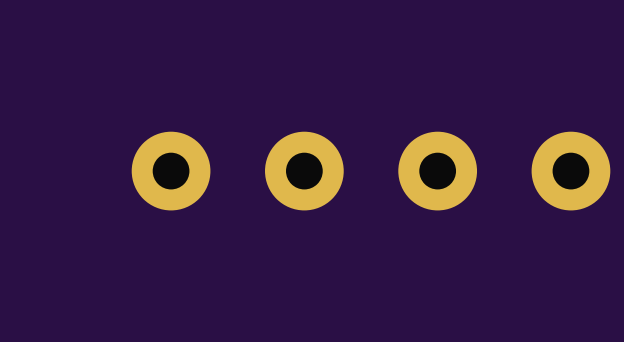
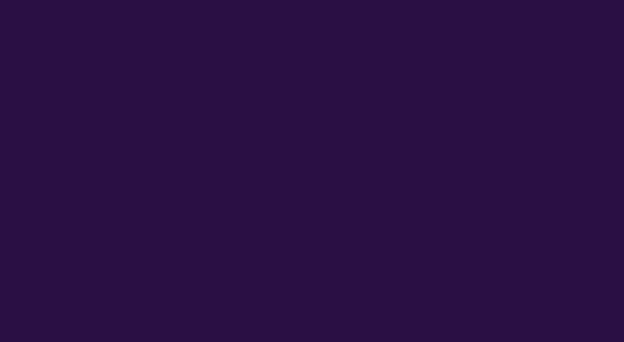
part: (237, 171) -> none
part: (504, 171) -> none

